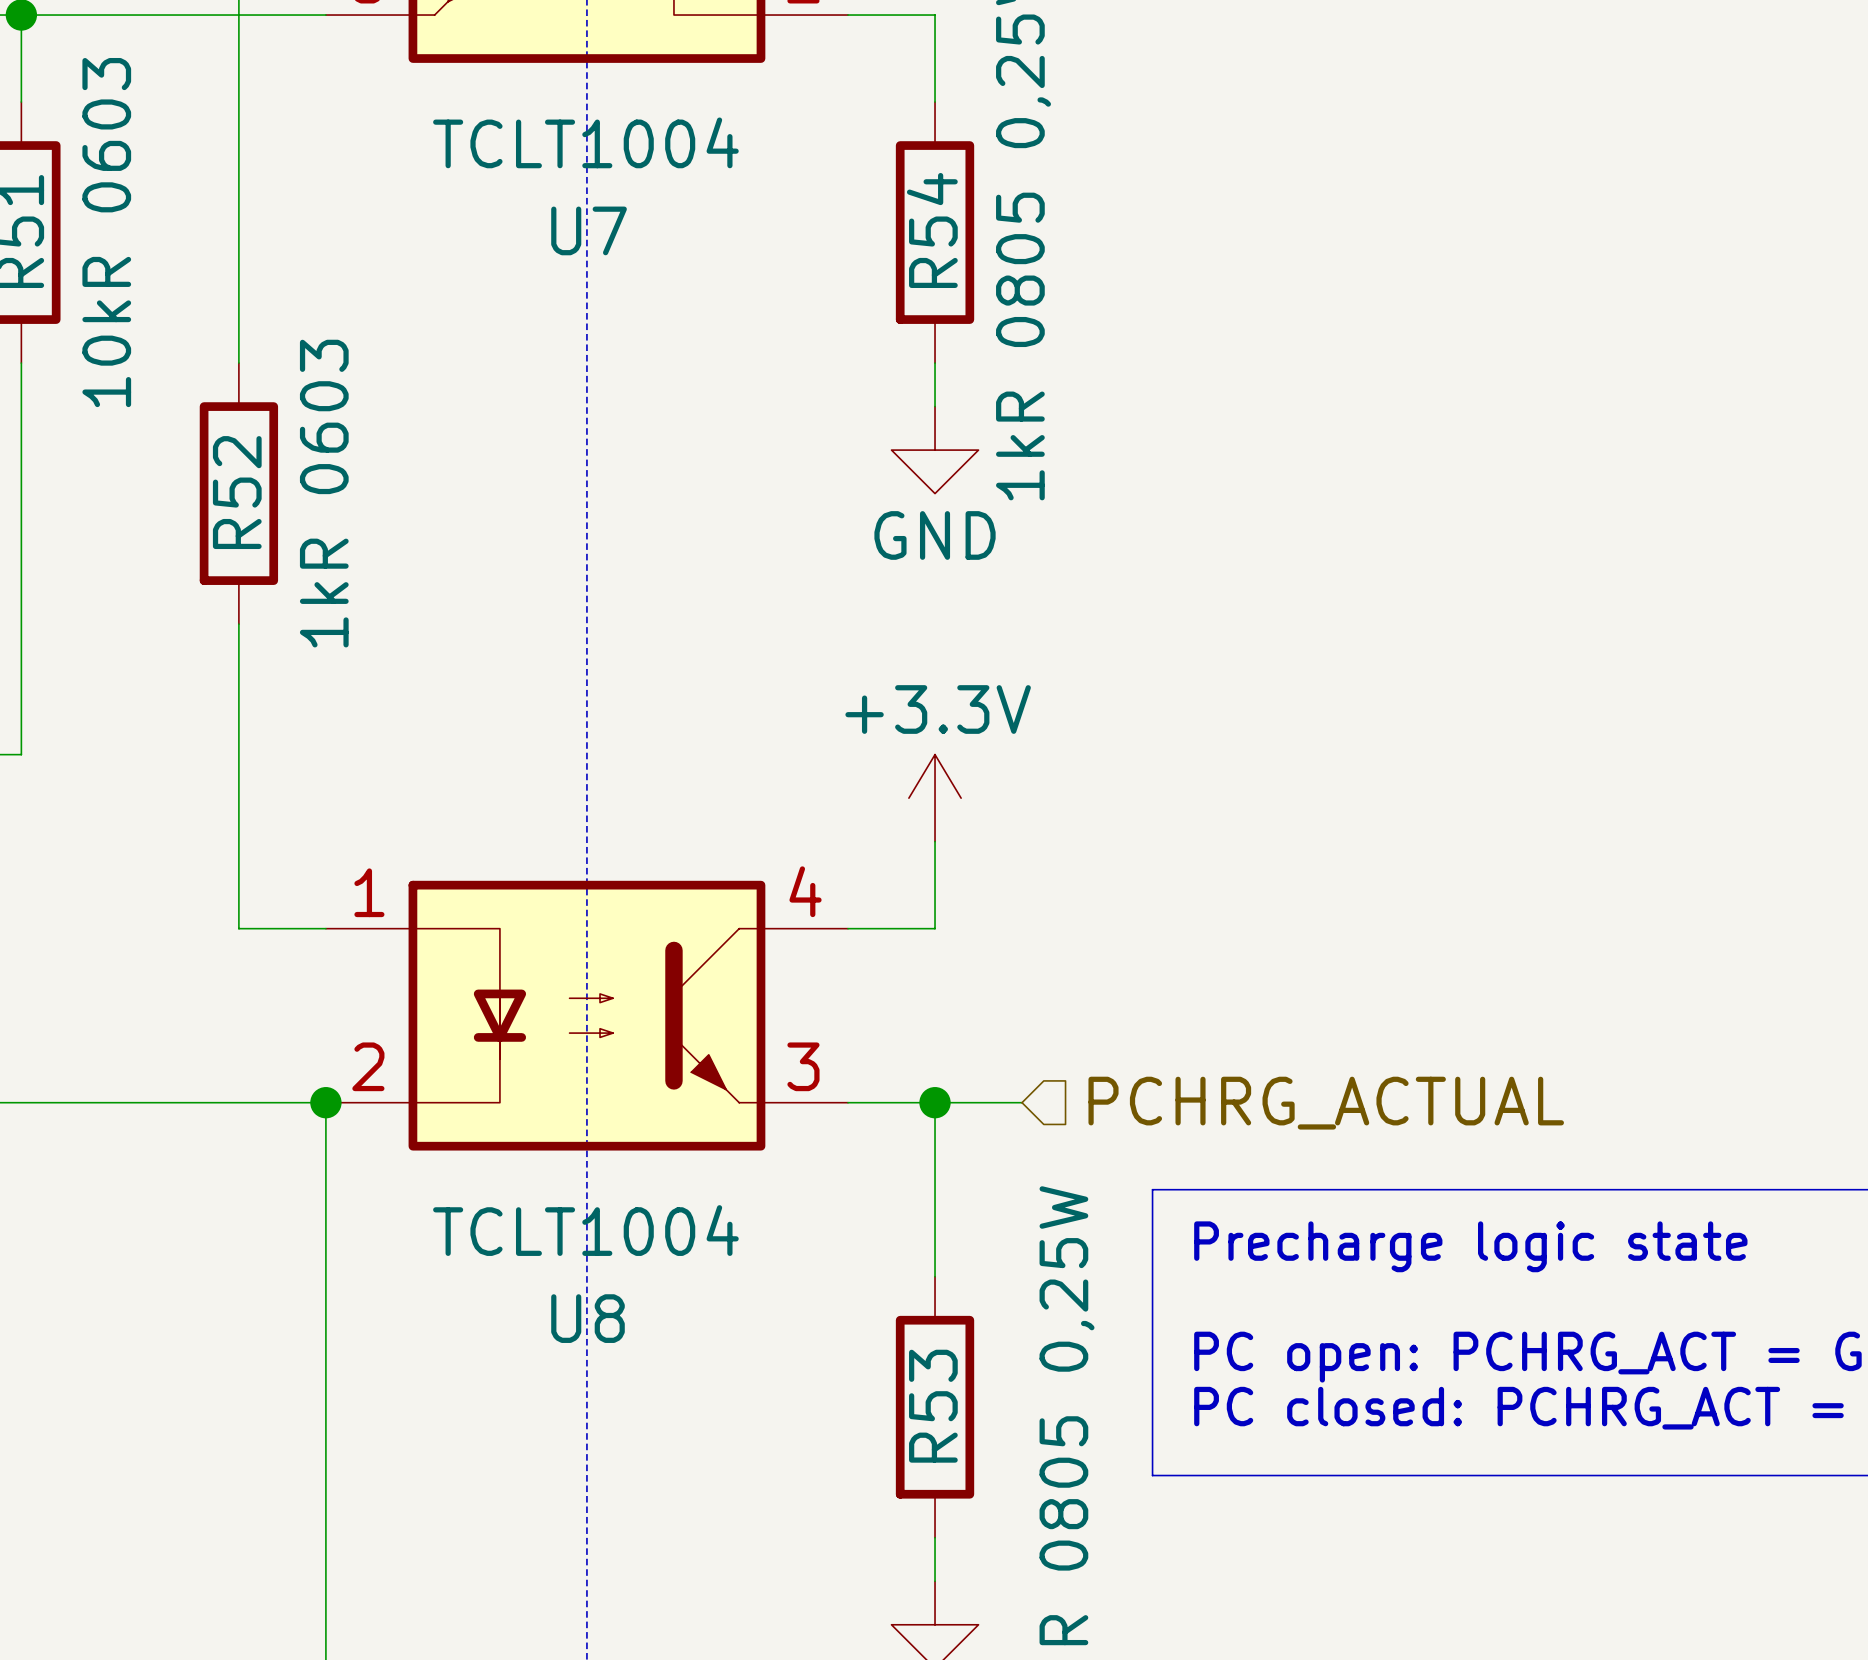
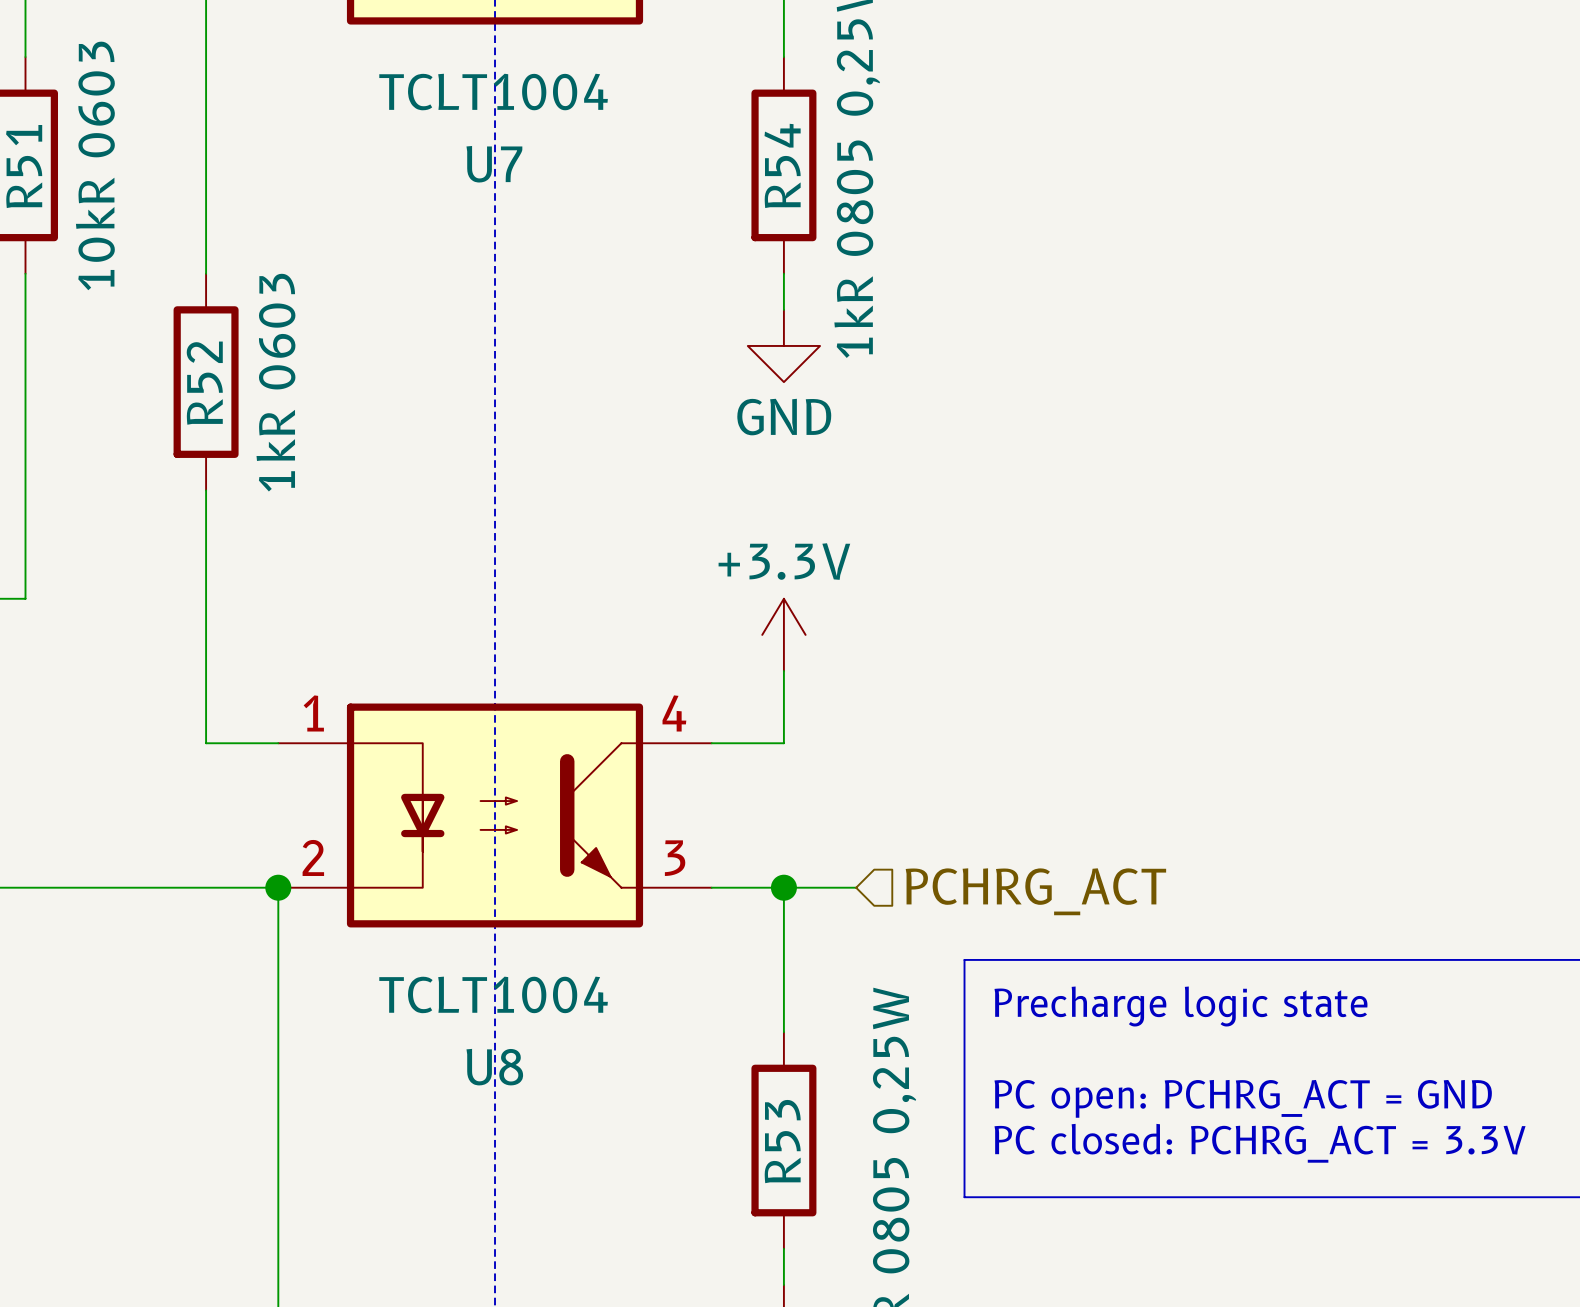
hierarchical label: PCHRG_ACTUAL (1326, 1103) -> PCHRG_ACT (1035, 891)

